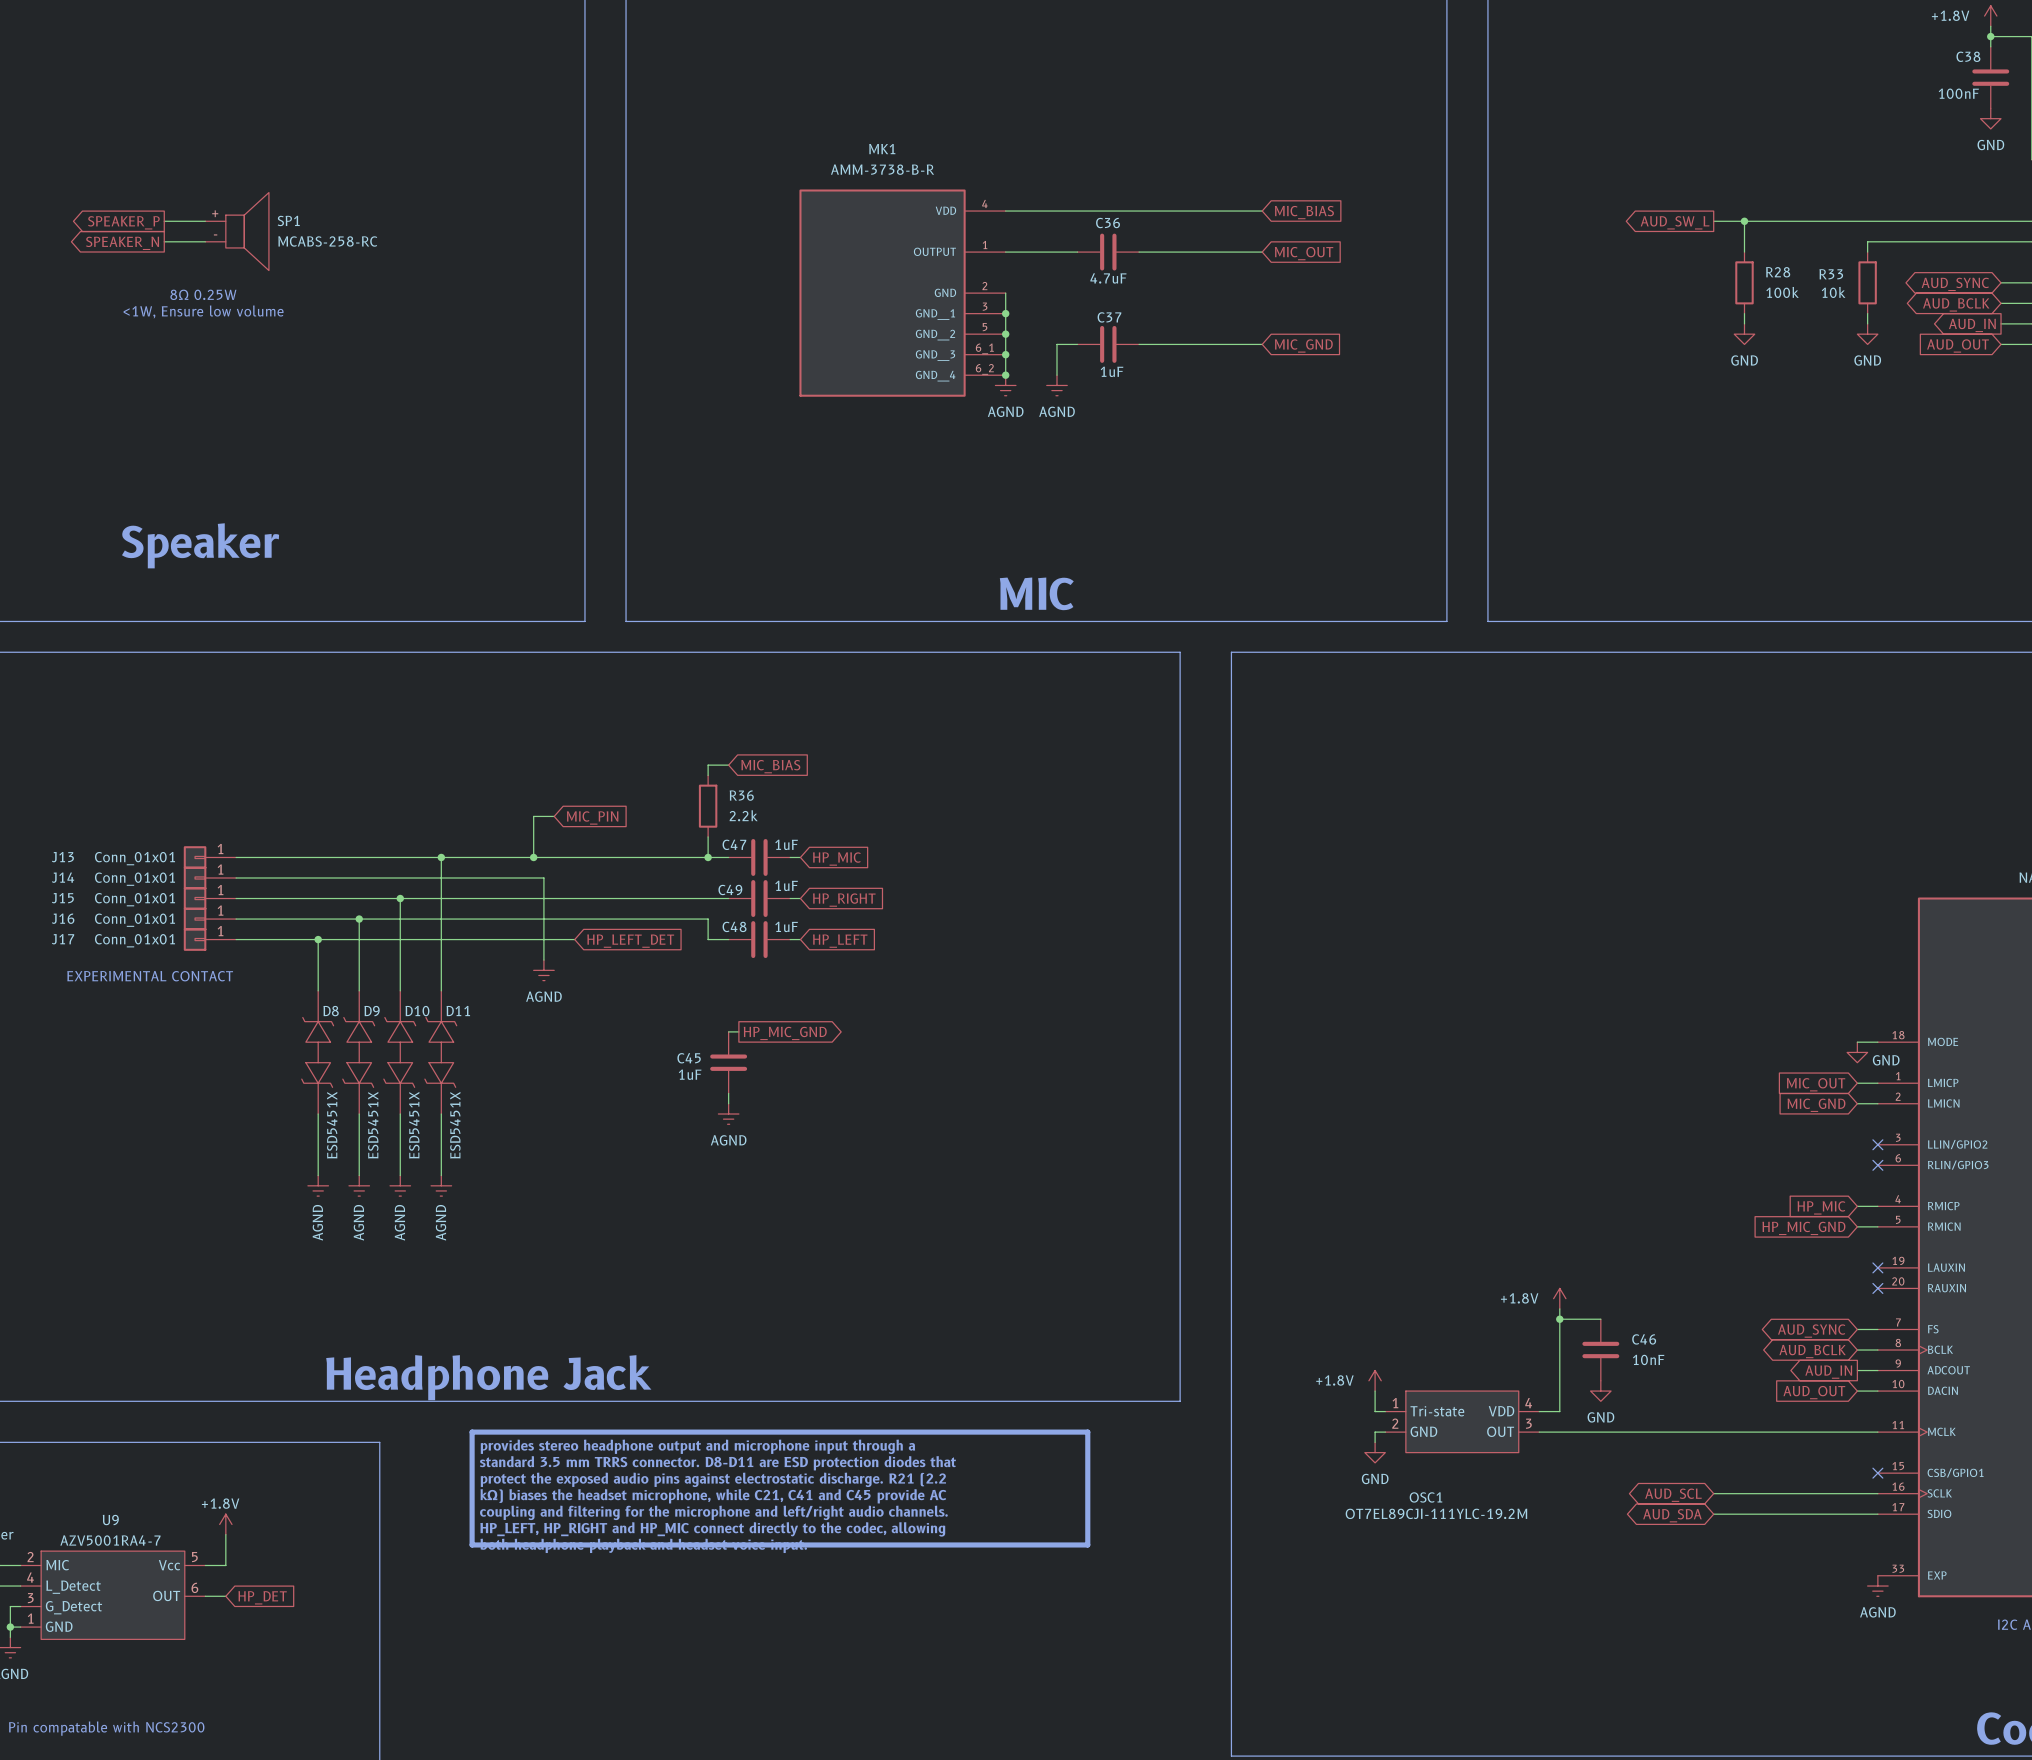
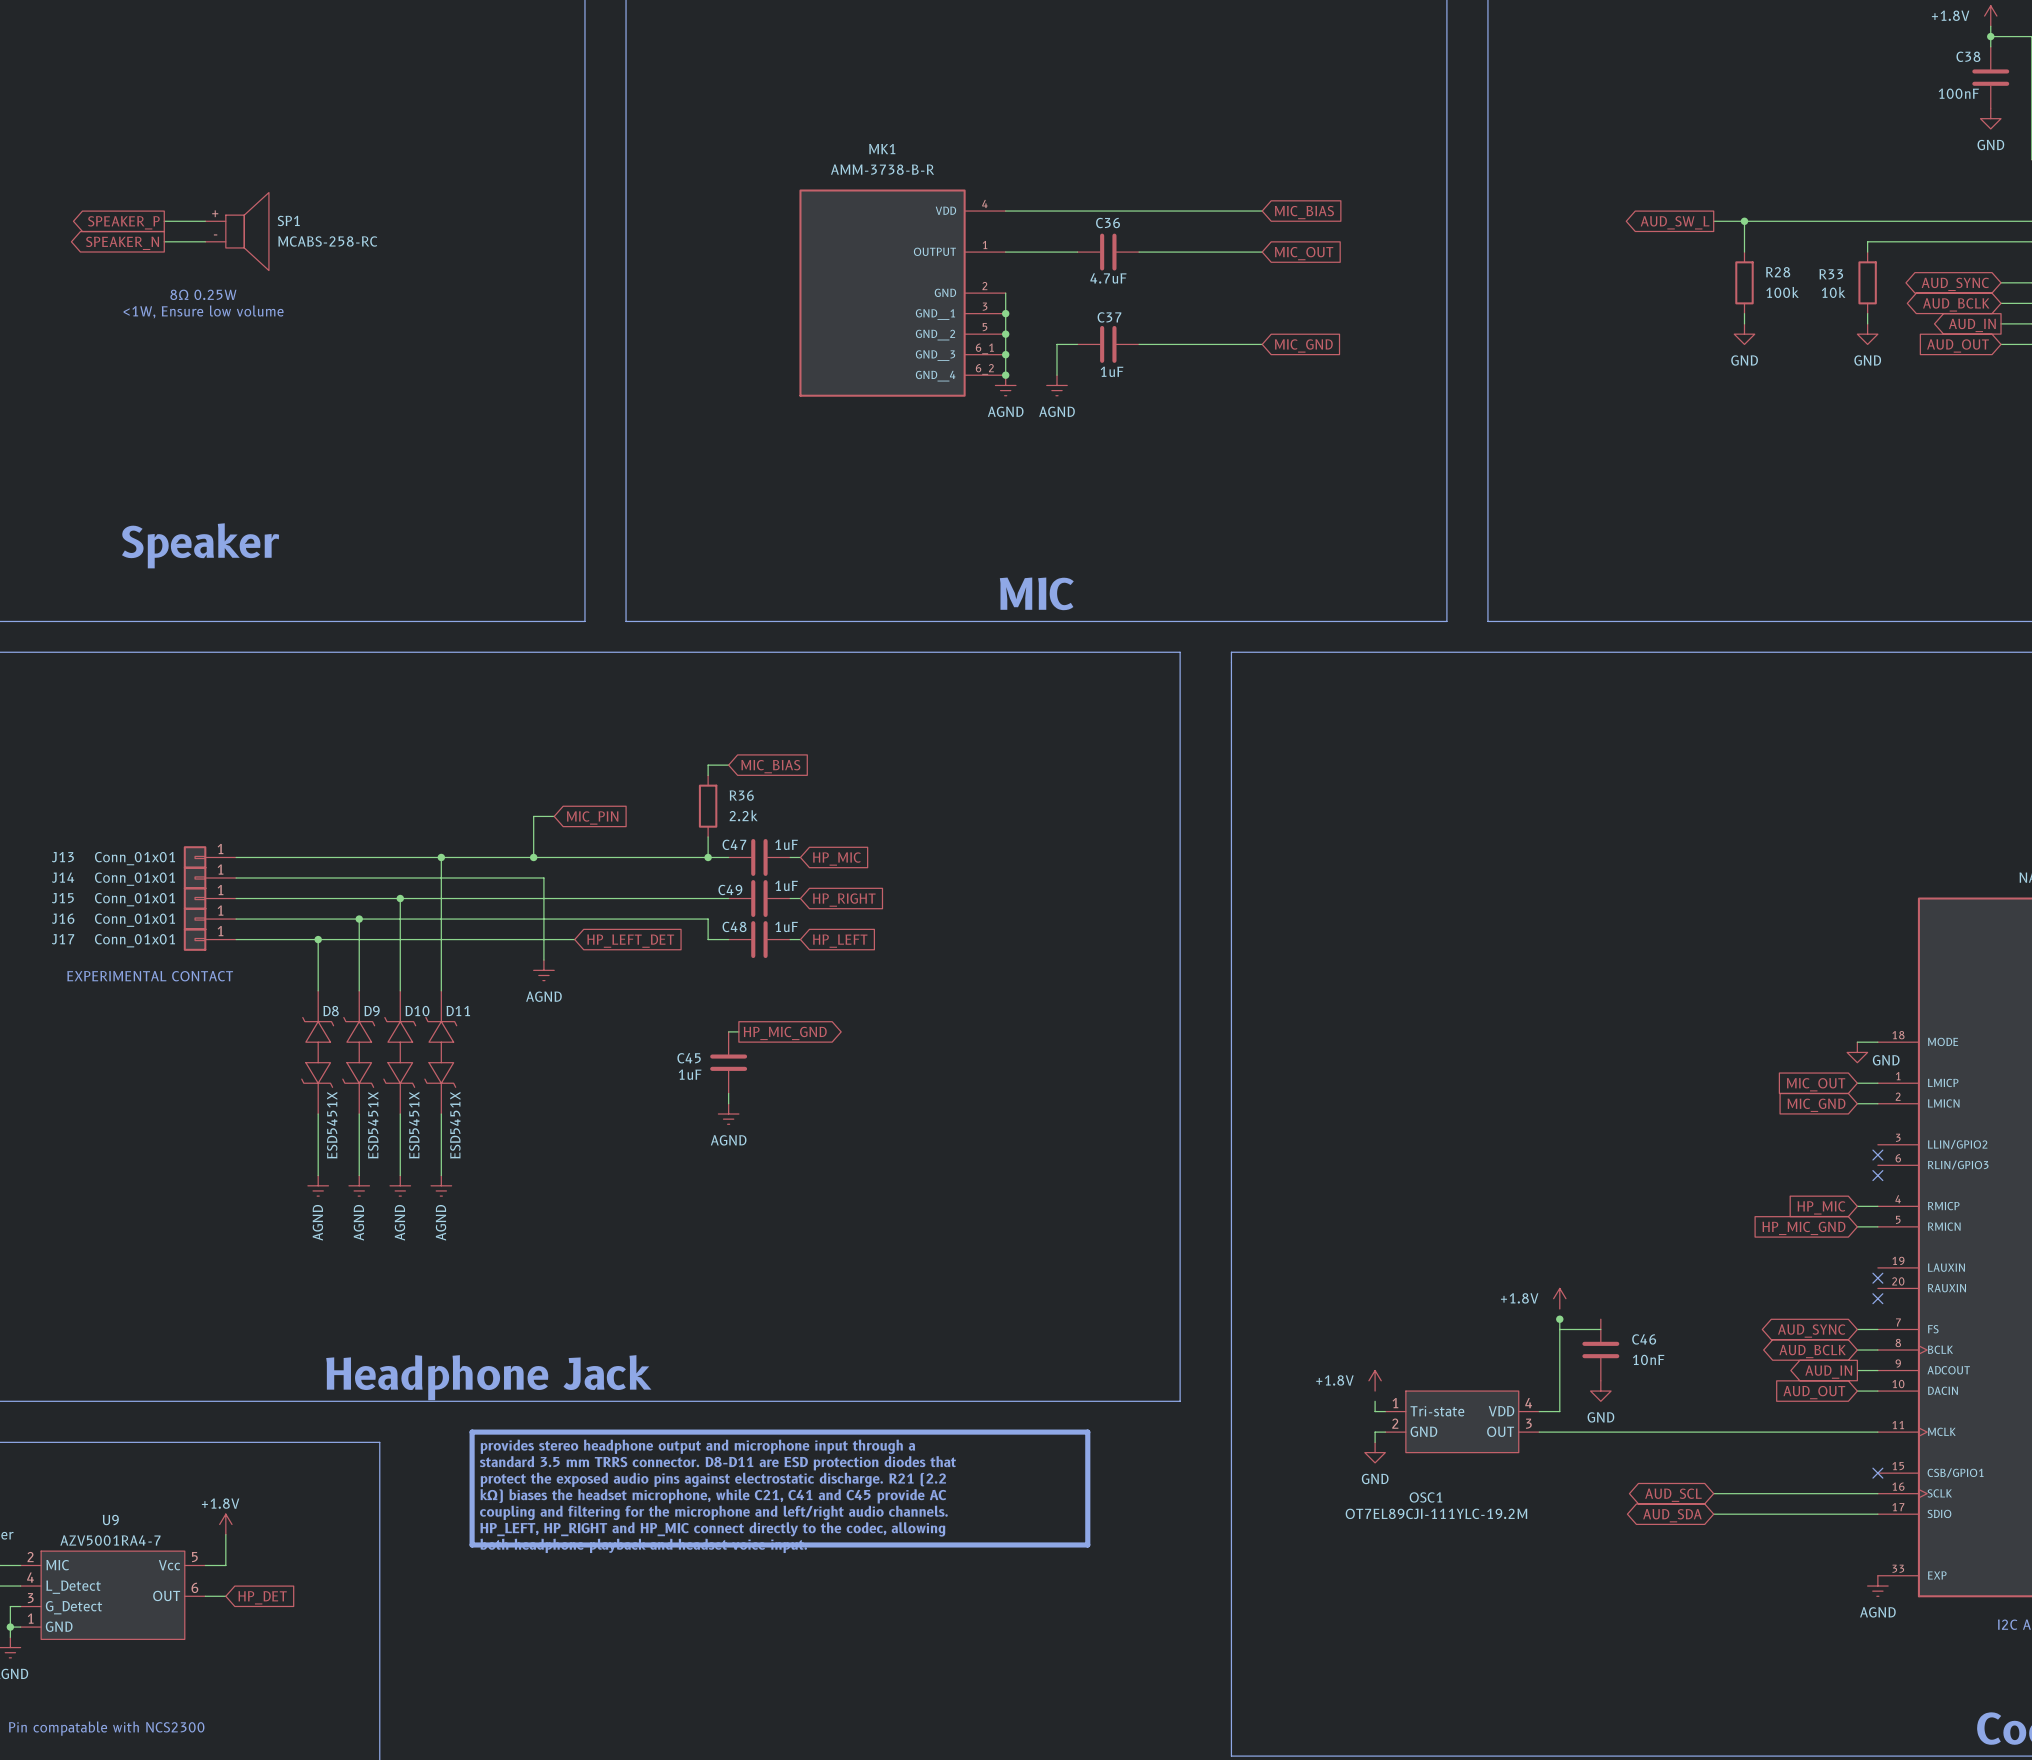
no-connect mark: (1877, 1144) -> none
no-connect mark: none -> (1877, 1155)
no-connect mark: (1877, 1165) -> none
no-connect mark: none -> (1877, 1175)
no-connect mark: (1877, 1267) -> none
no-connect mark: none -> (1877, 1278)
no-connect mark: (1877, 1288) -> none
no-connect mark: none -> (1877, 1298)
wire: (1559, 1308) (1559, 1319) (1600, 1319) -> none
wire: none -> (1559, 1329) (1600, 1329)
wire: (1375, 1391) (1375, 1401) -> none

